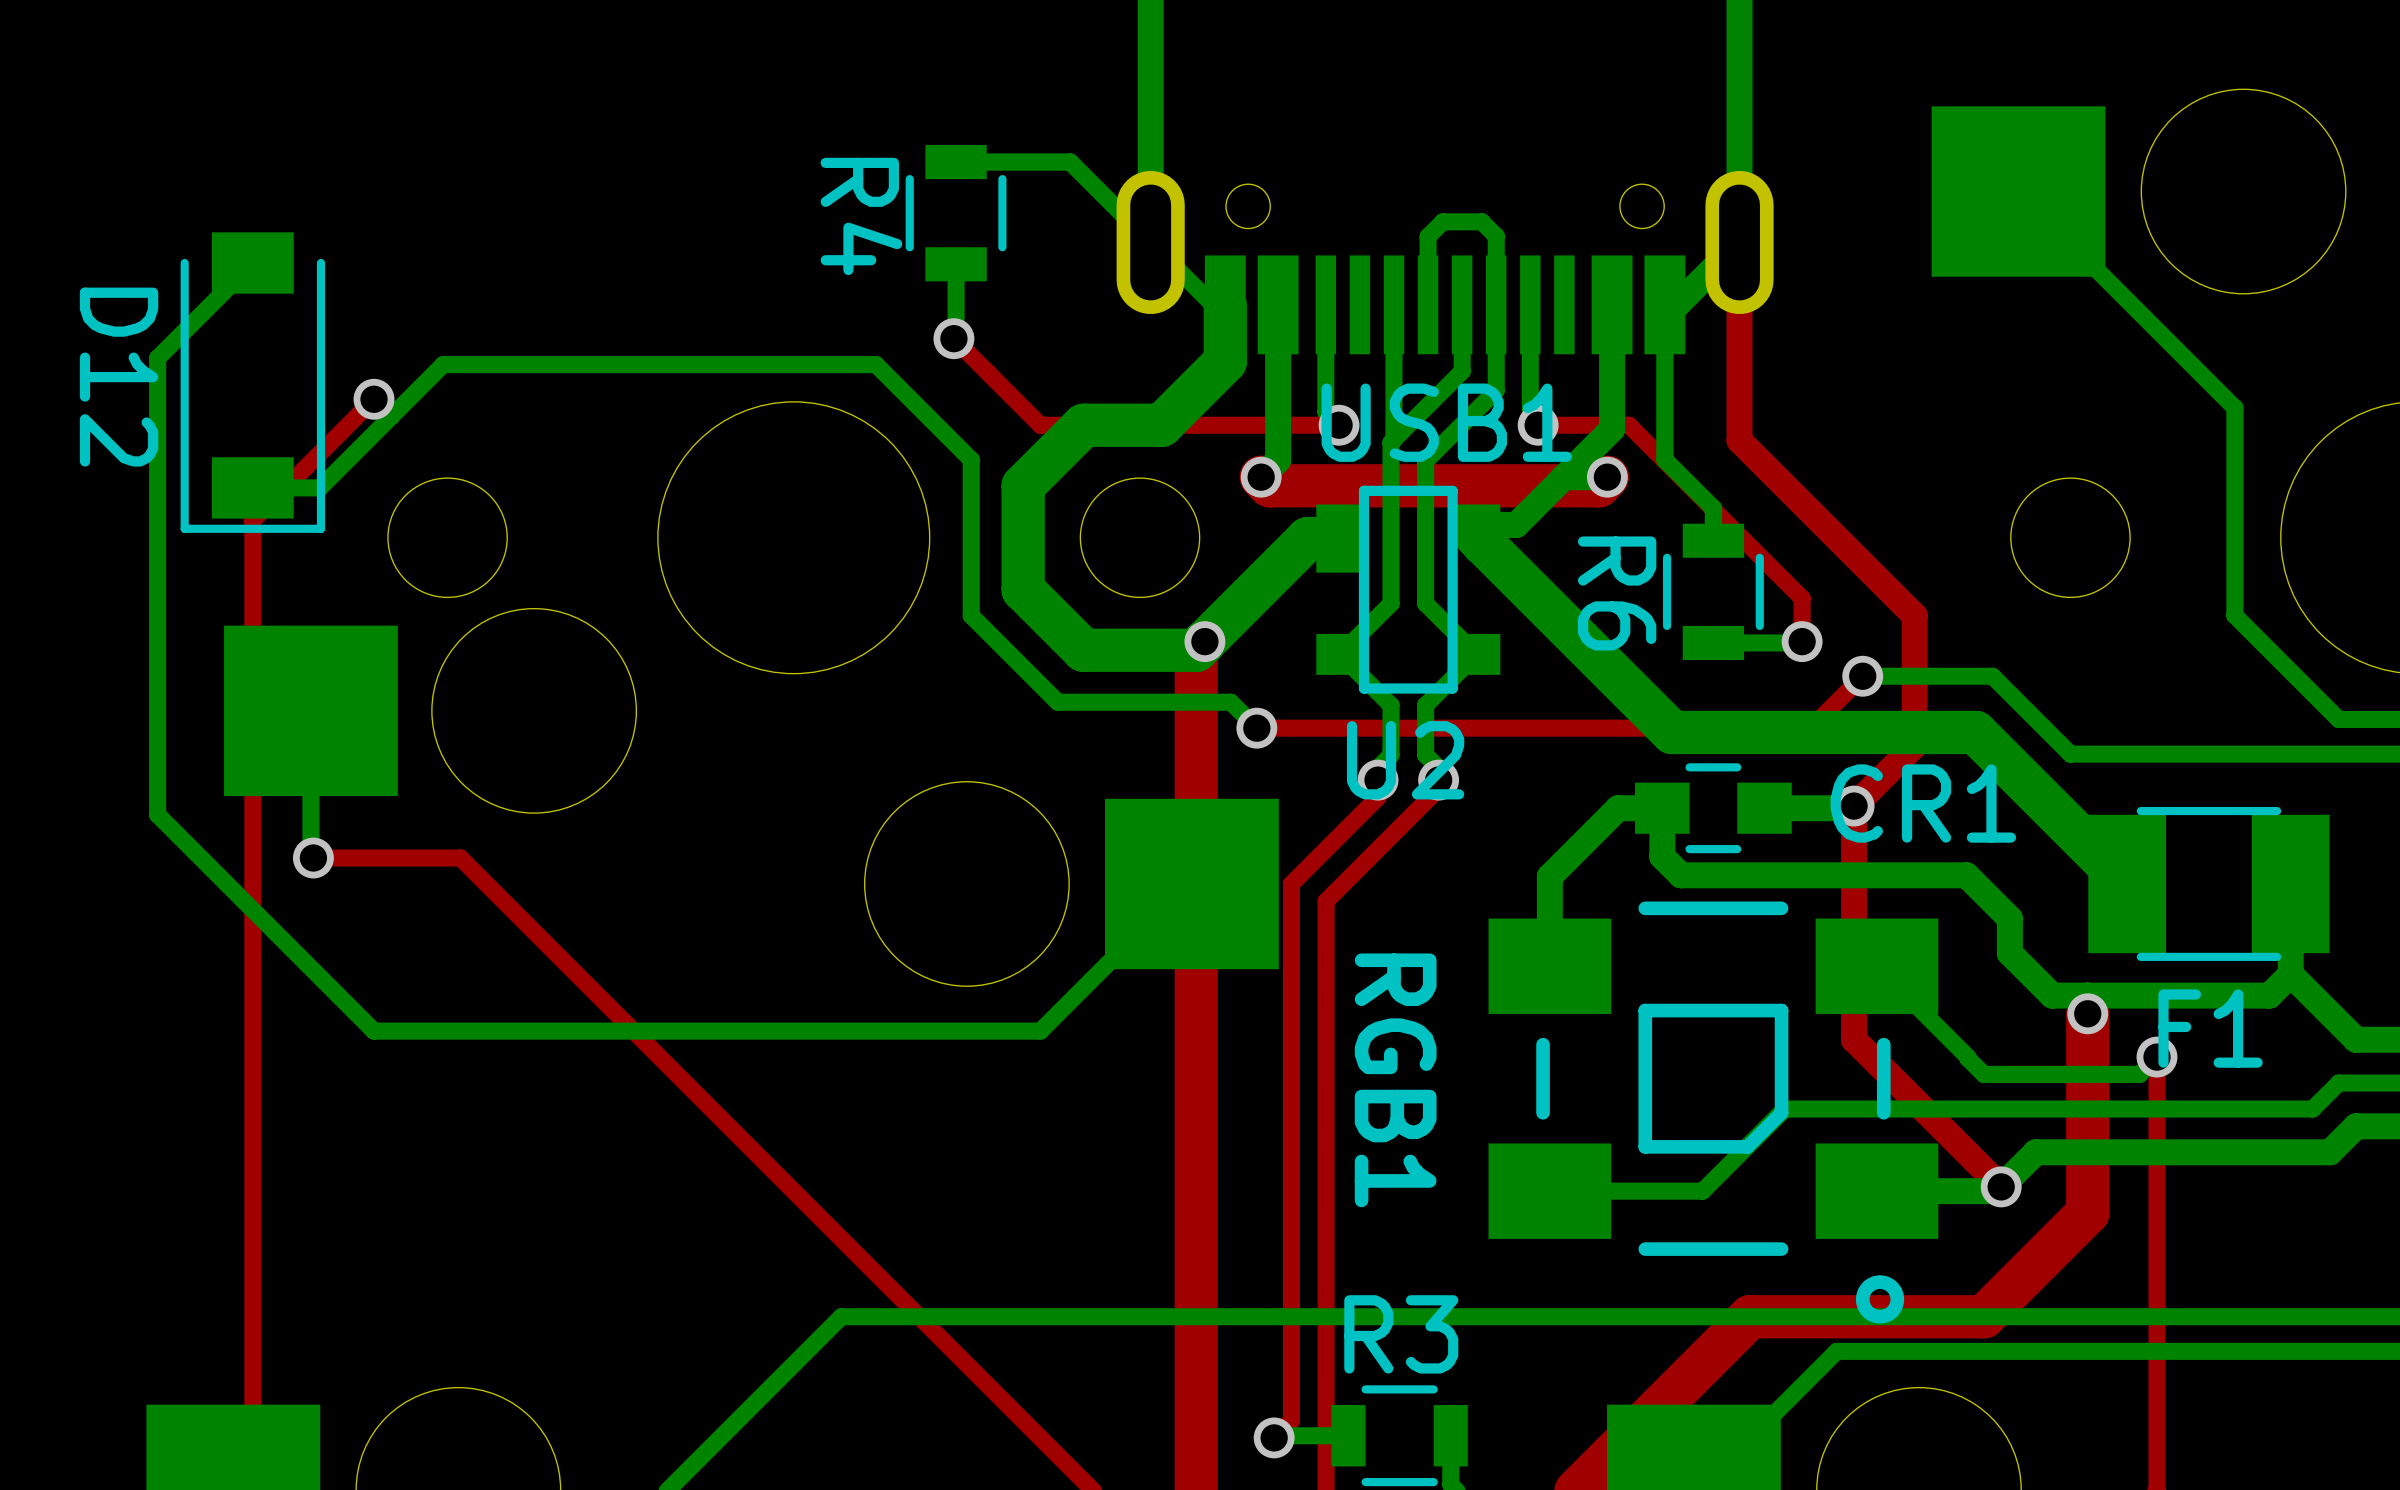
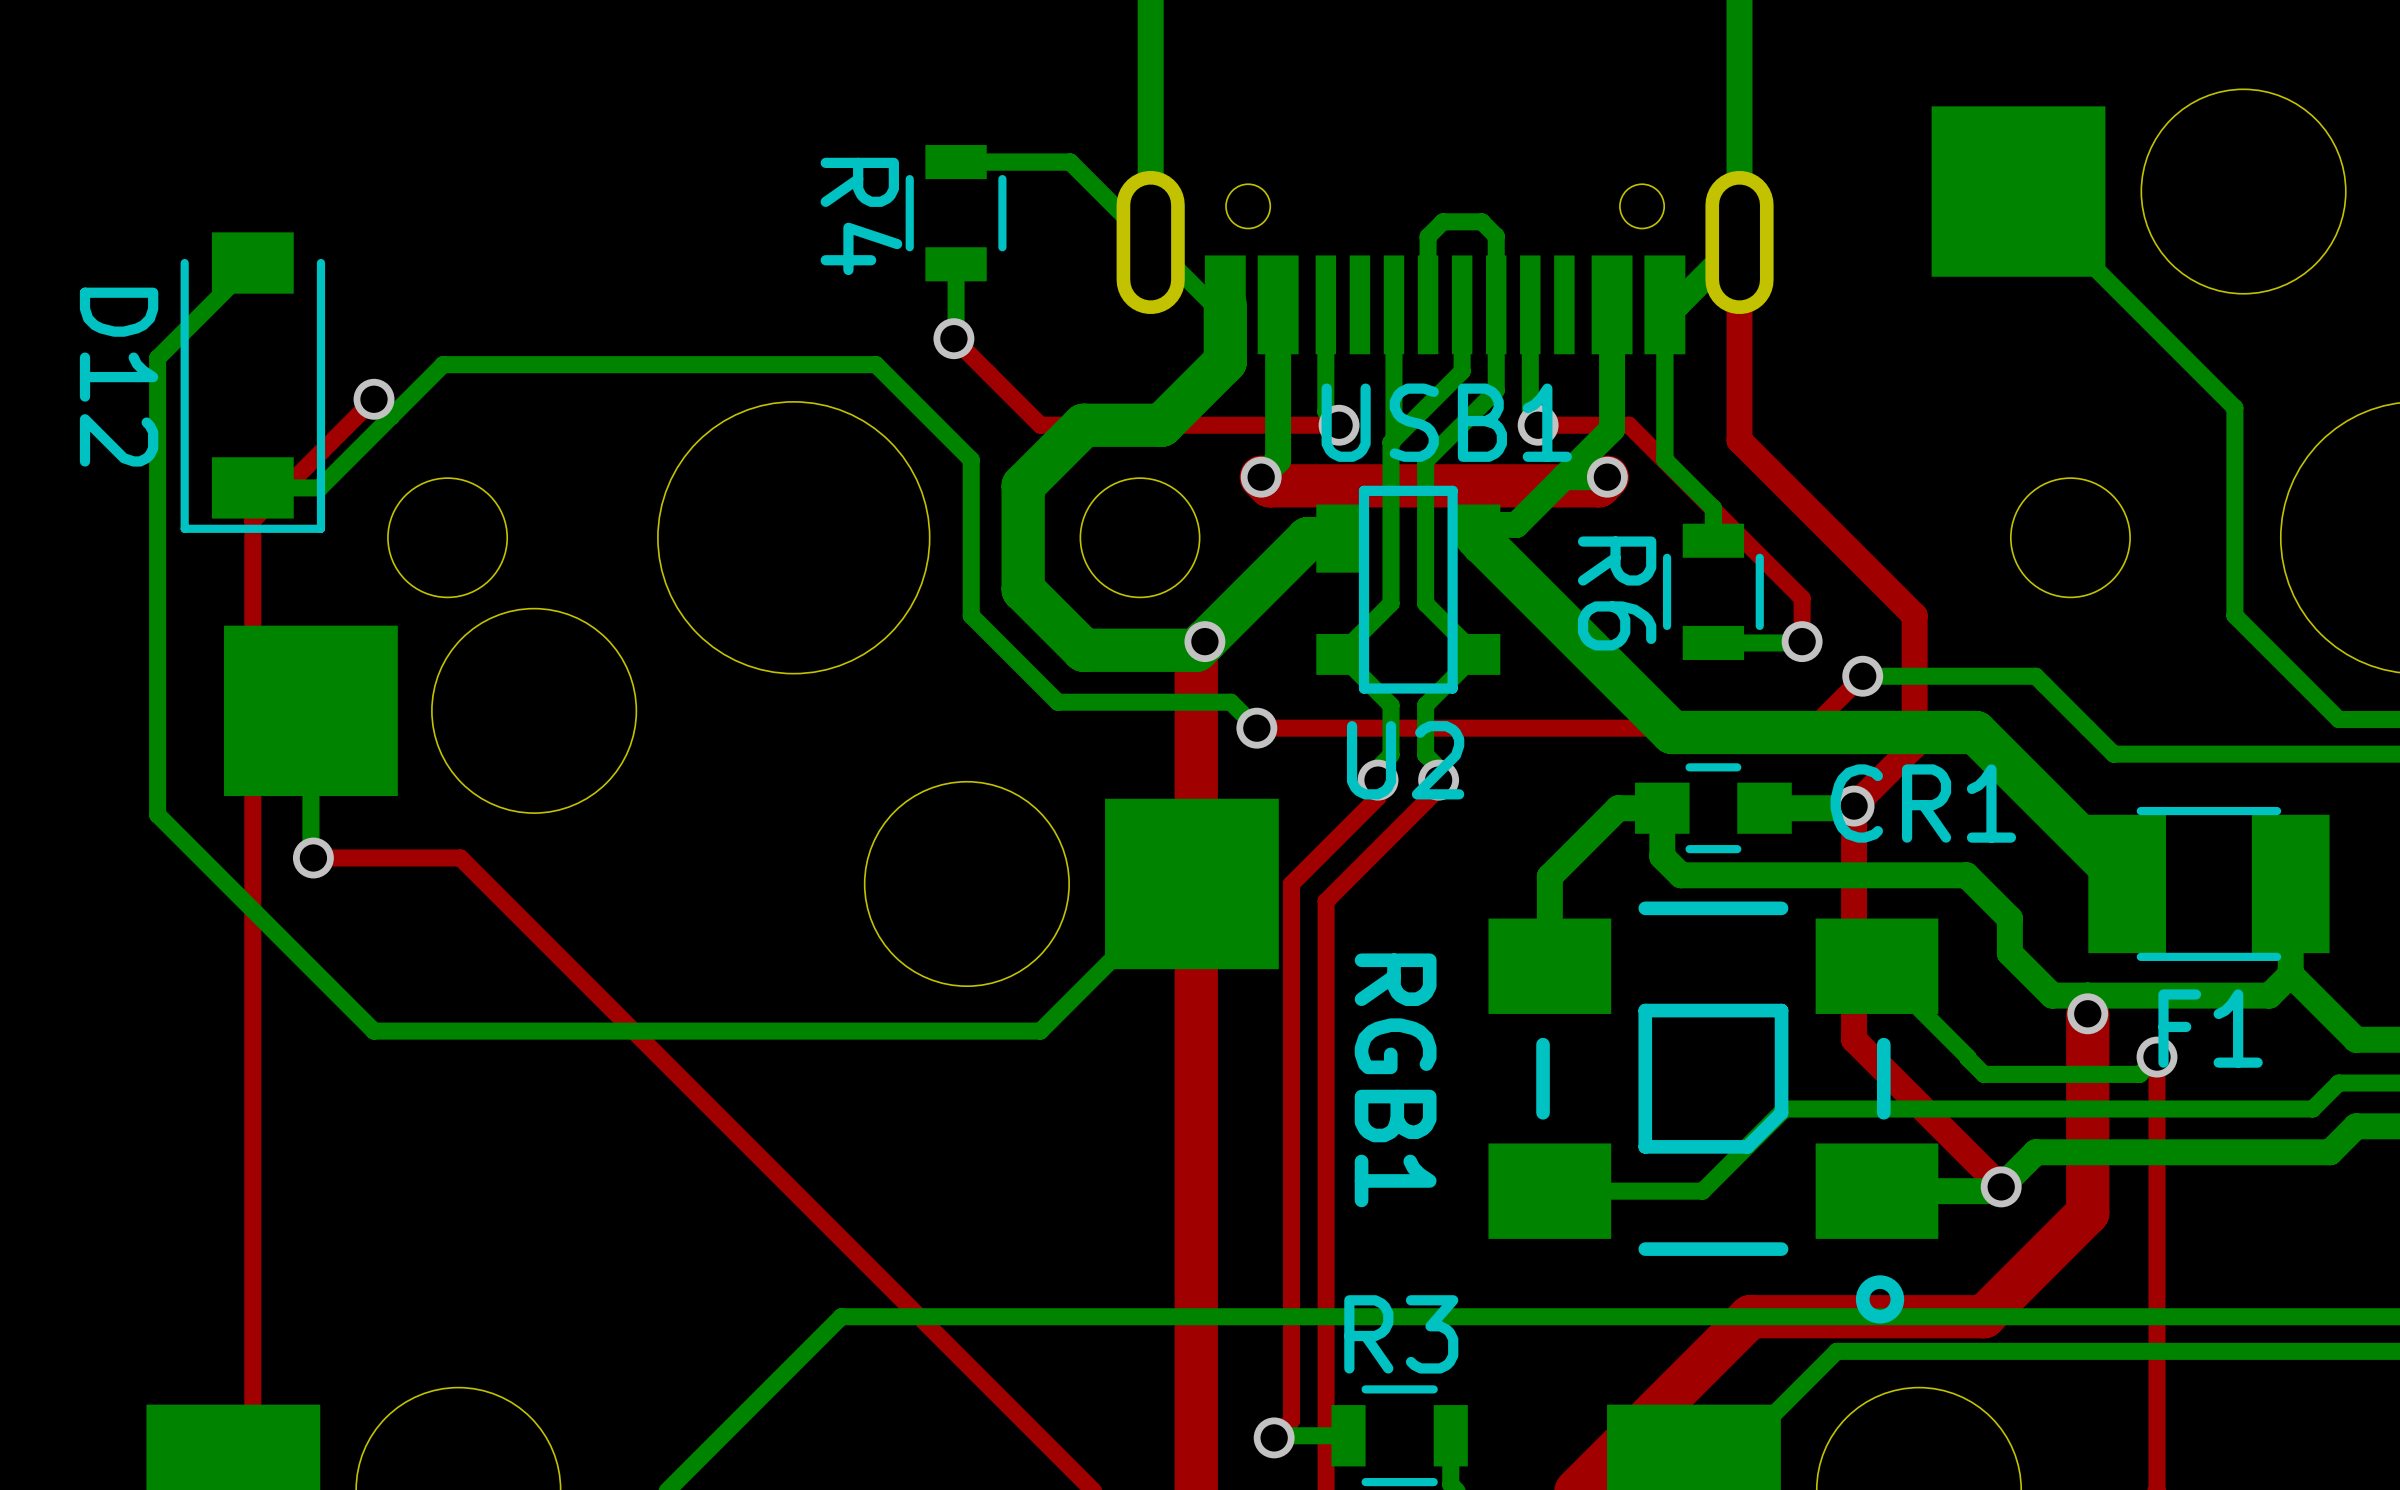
bottom track: (1992, 676) (2070, 754) (2113, 754) -> (1992, 676) (2035, 676) (2113, 754)

